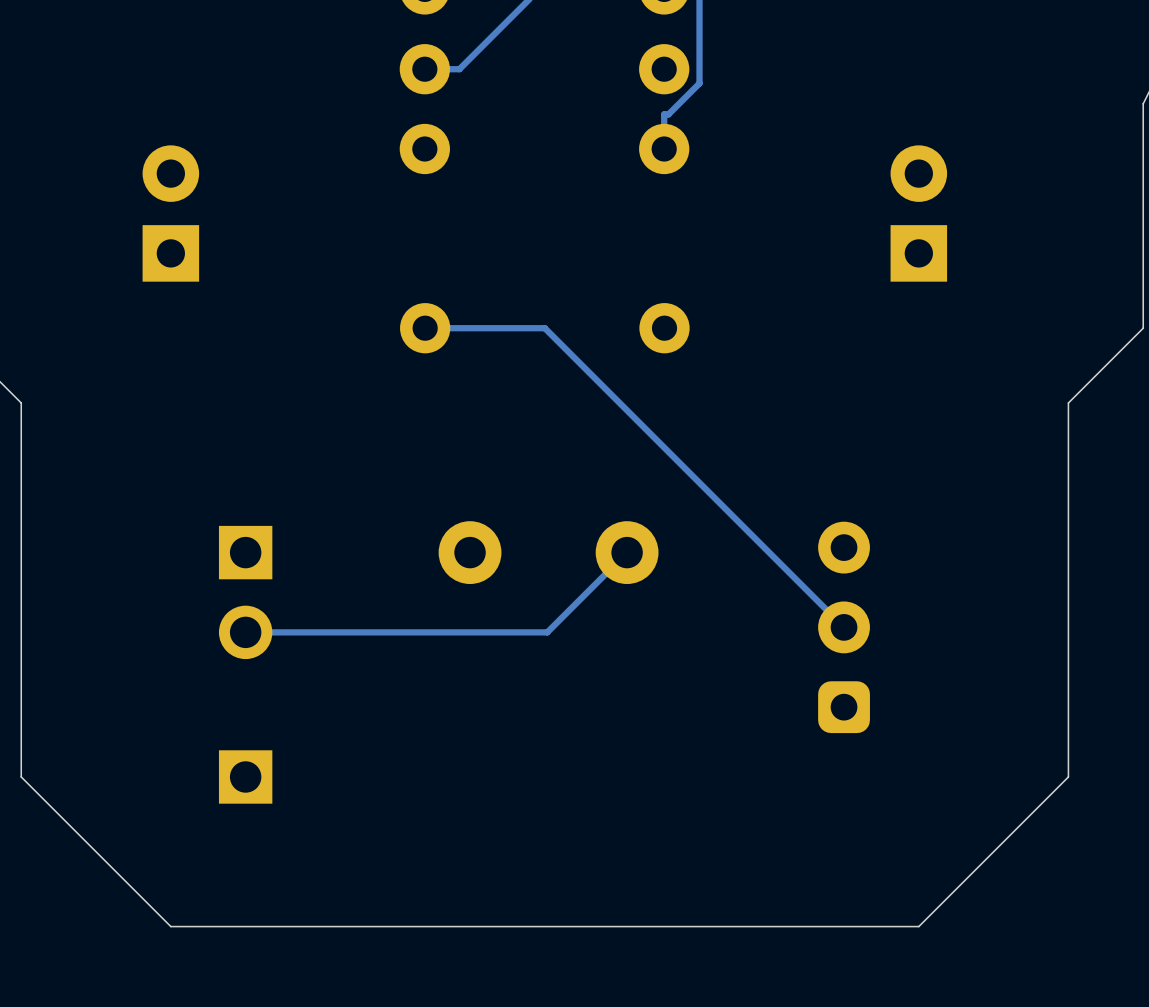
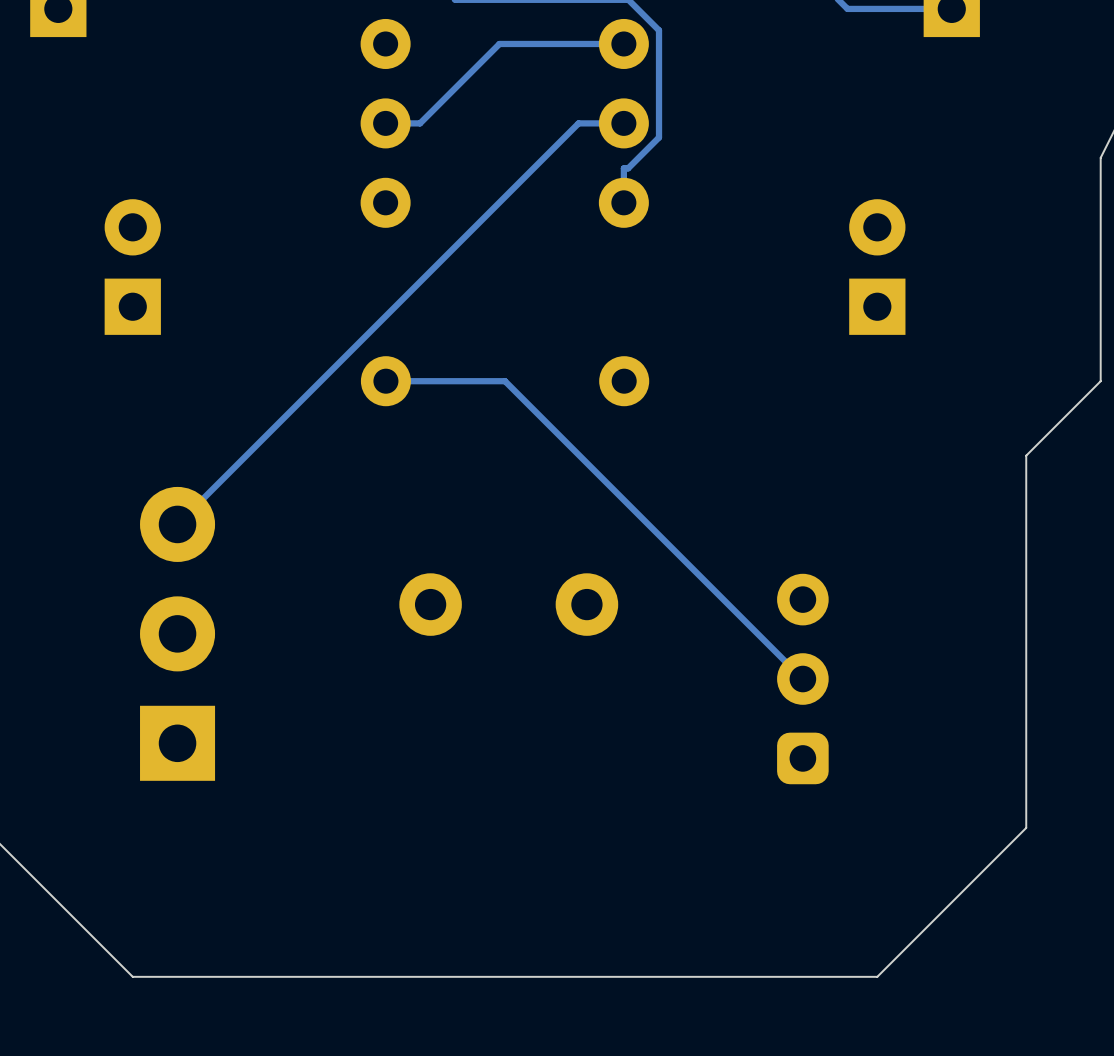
track: none -> (623, 123) (578, 123) (177, 524)
track: (627, 552) (547, 632) (245, 632) -> none
part: none -> (177, 633)
part: (245, 592) -> none
part: (245, 776) -> none

